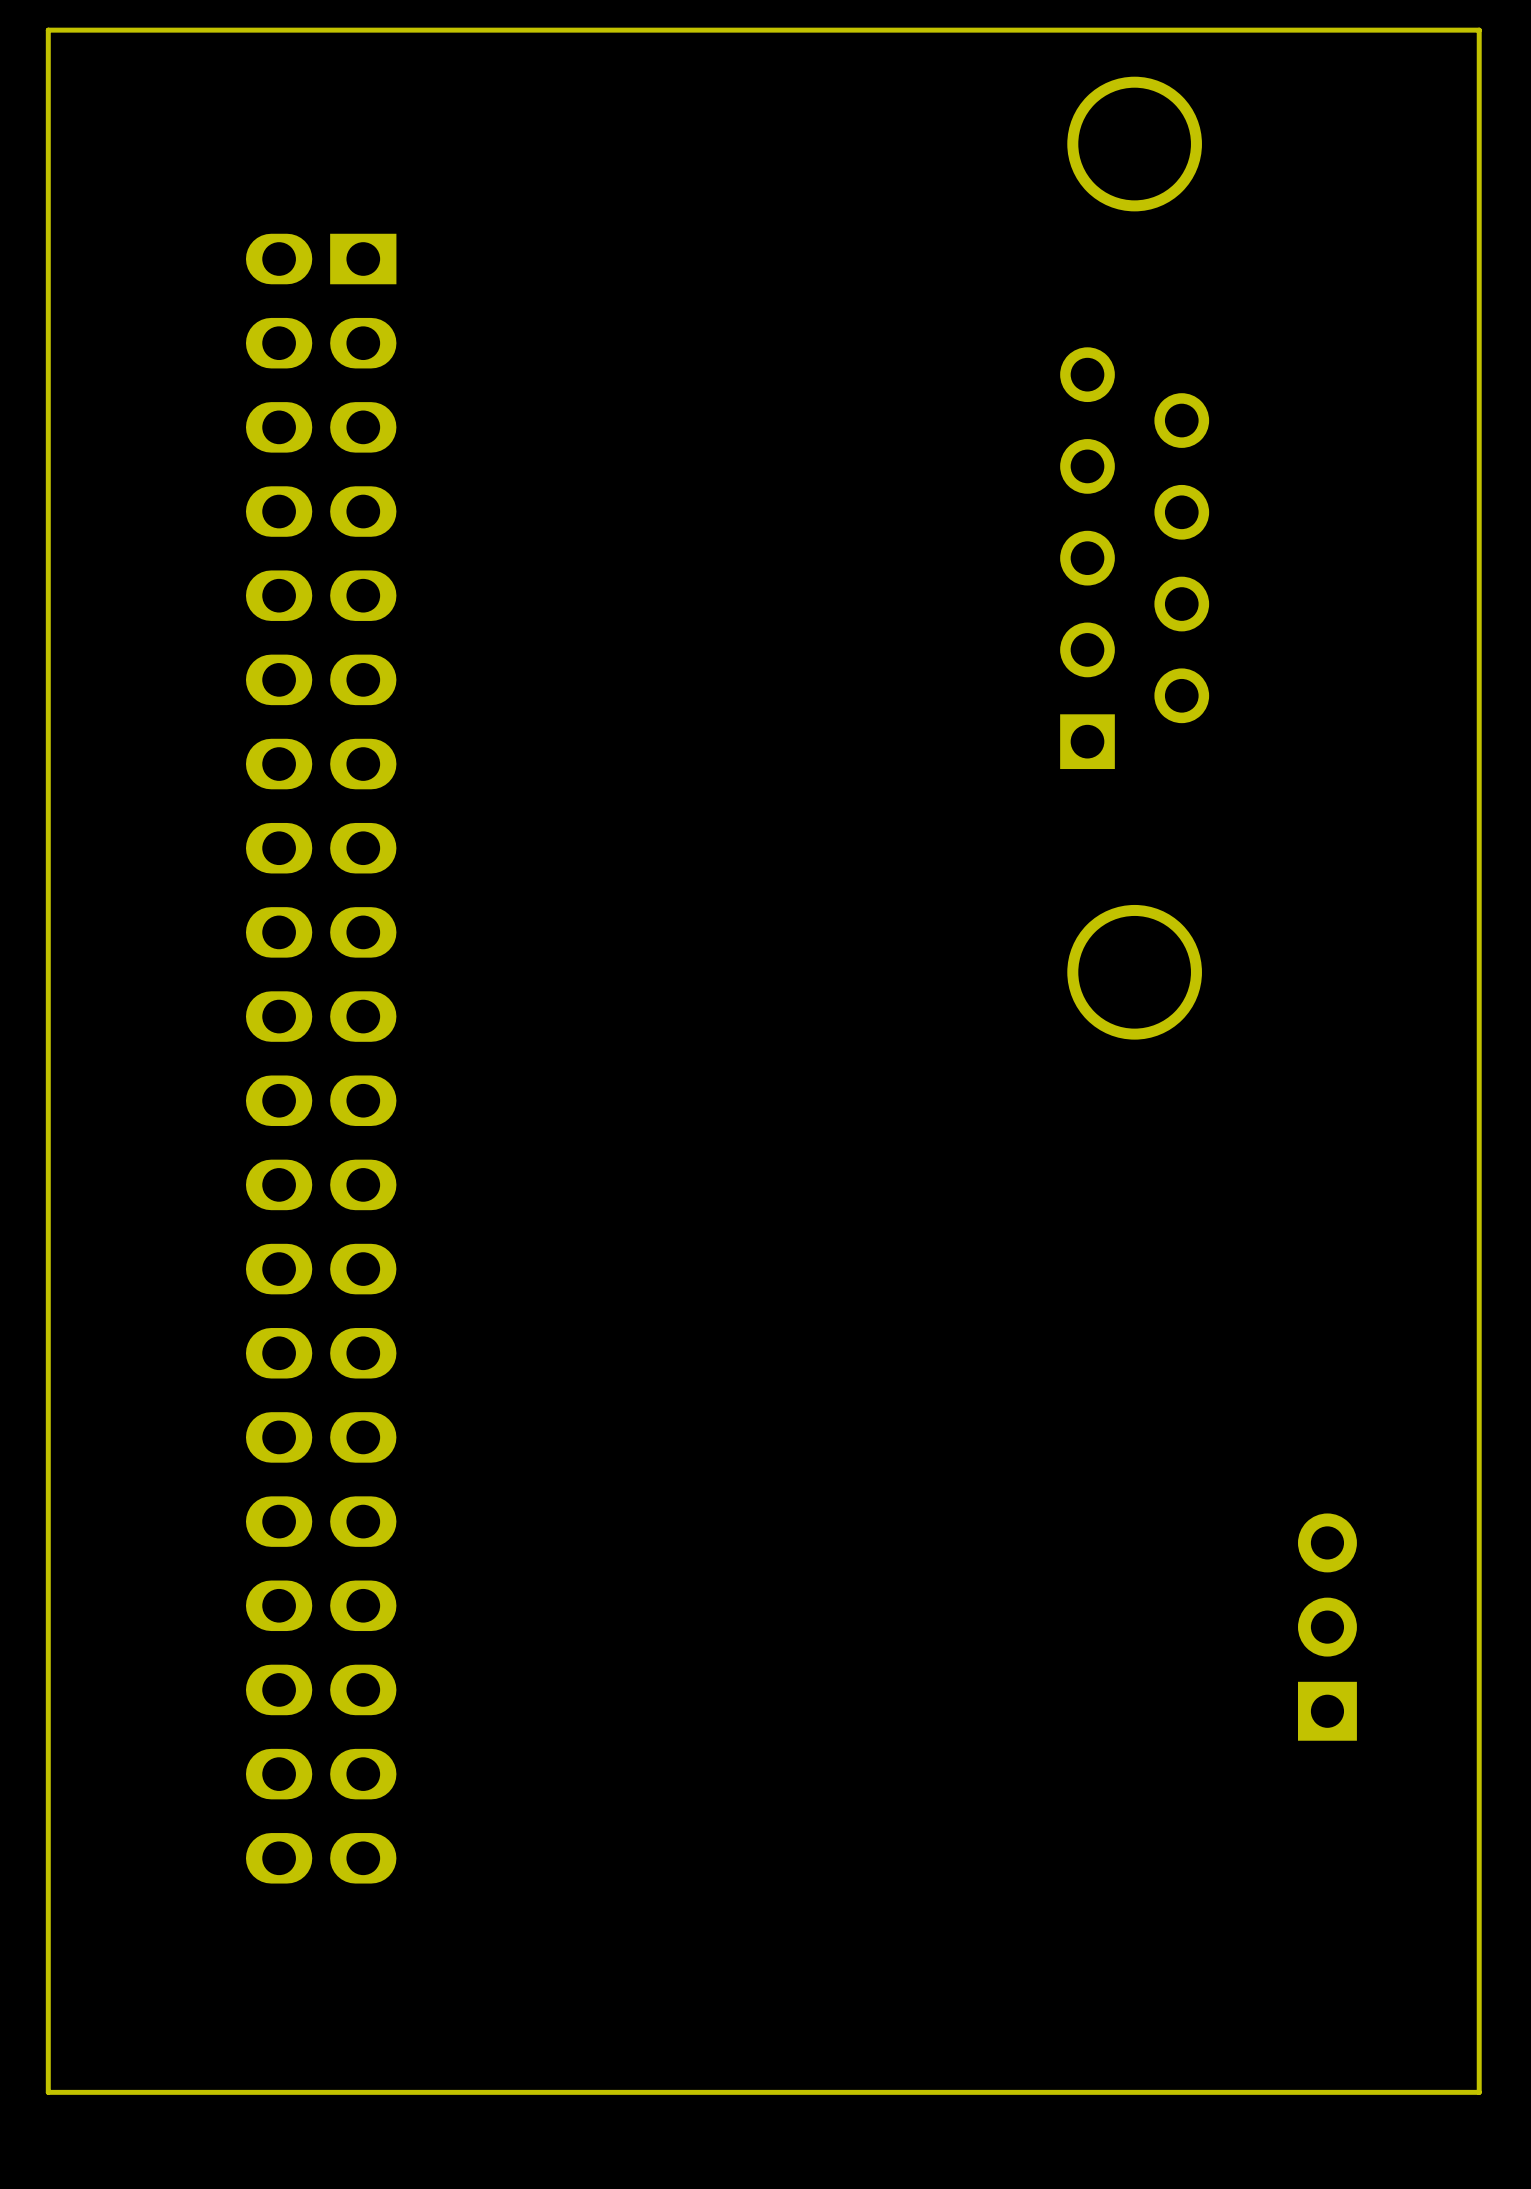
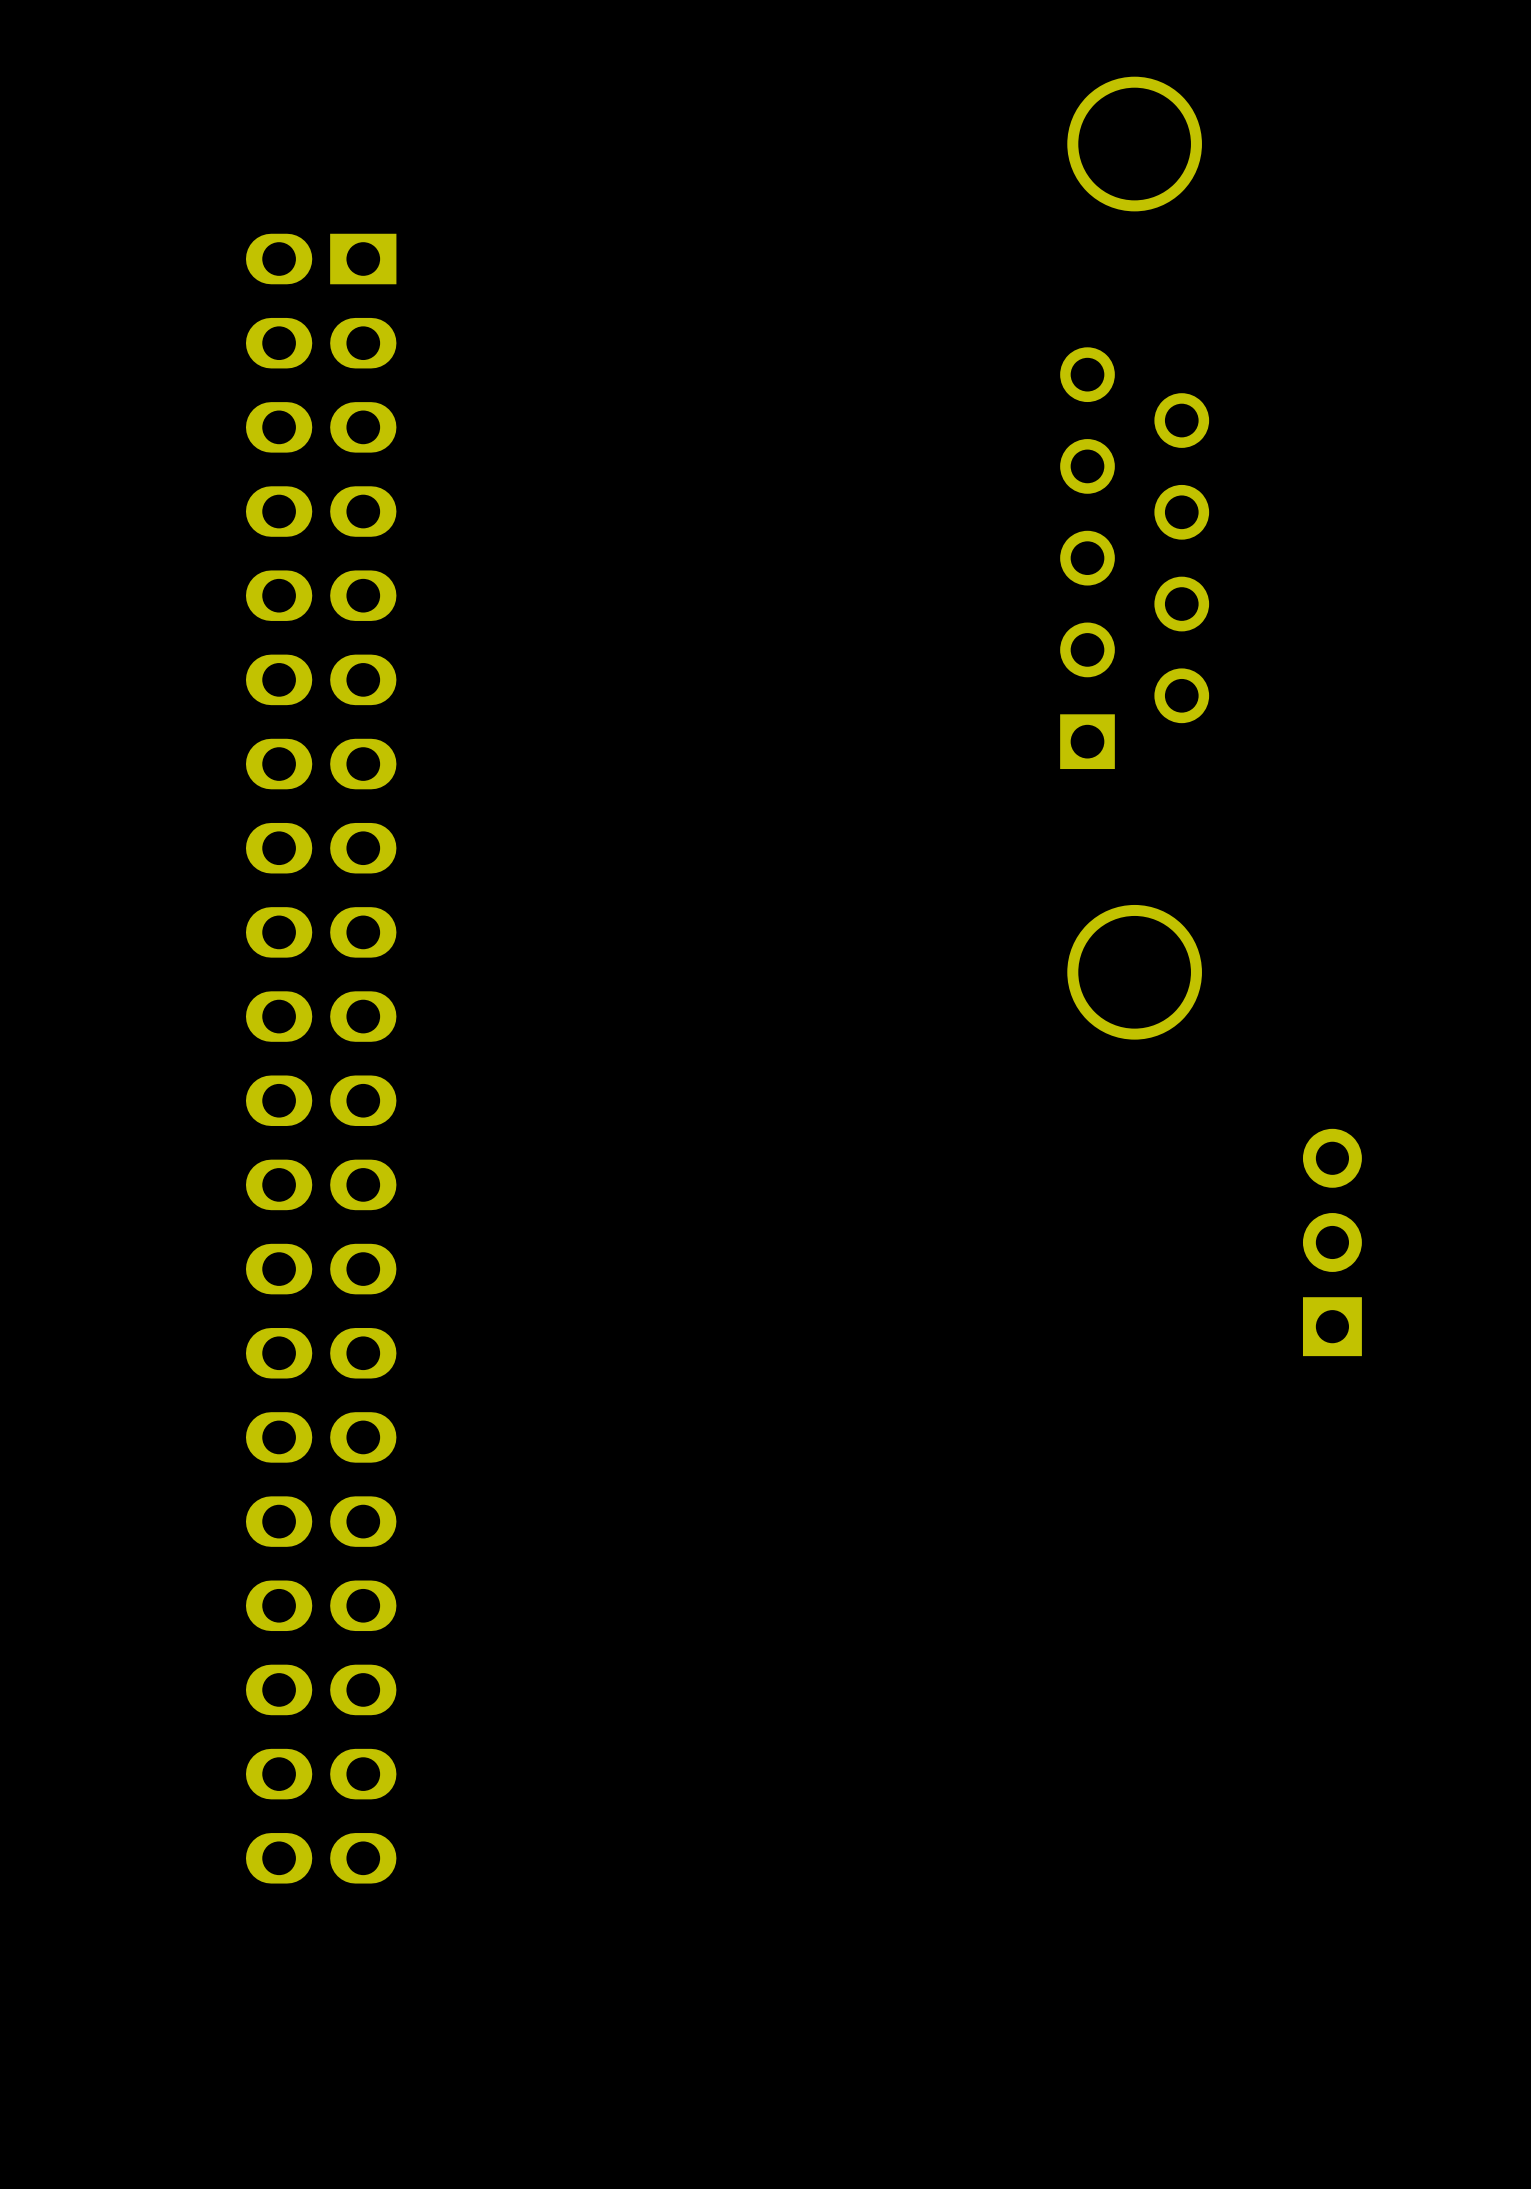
board edge: (1479, 30) (1479, 2092) (48, 2092) (48, 30) (1479, 30) -> none
part position: (1327, 1627) -> (1332, 1242)

